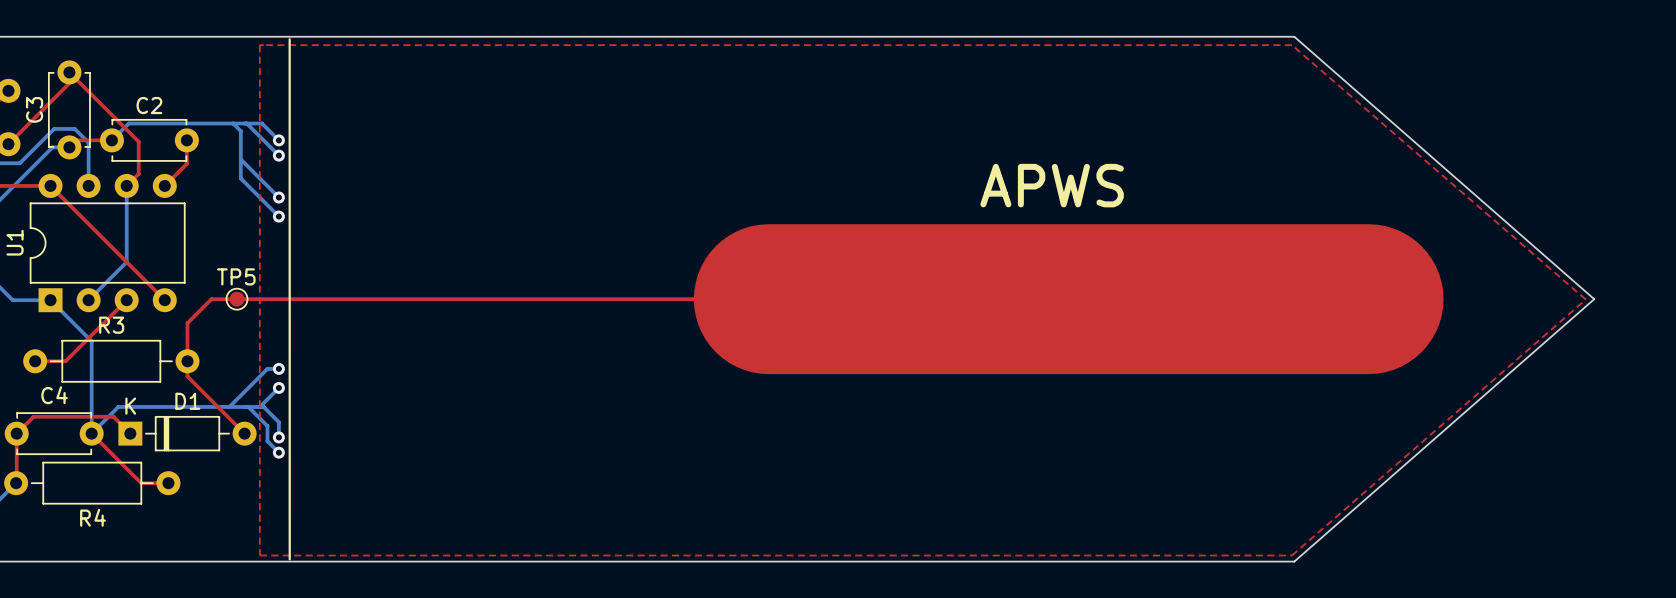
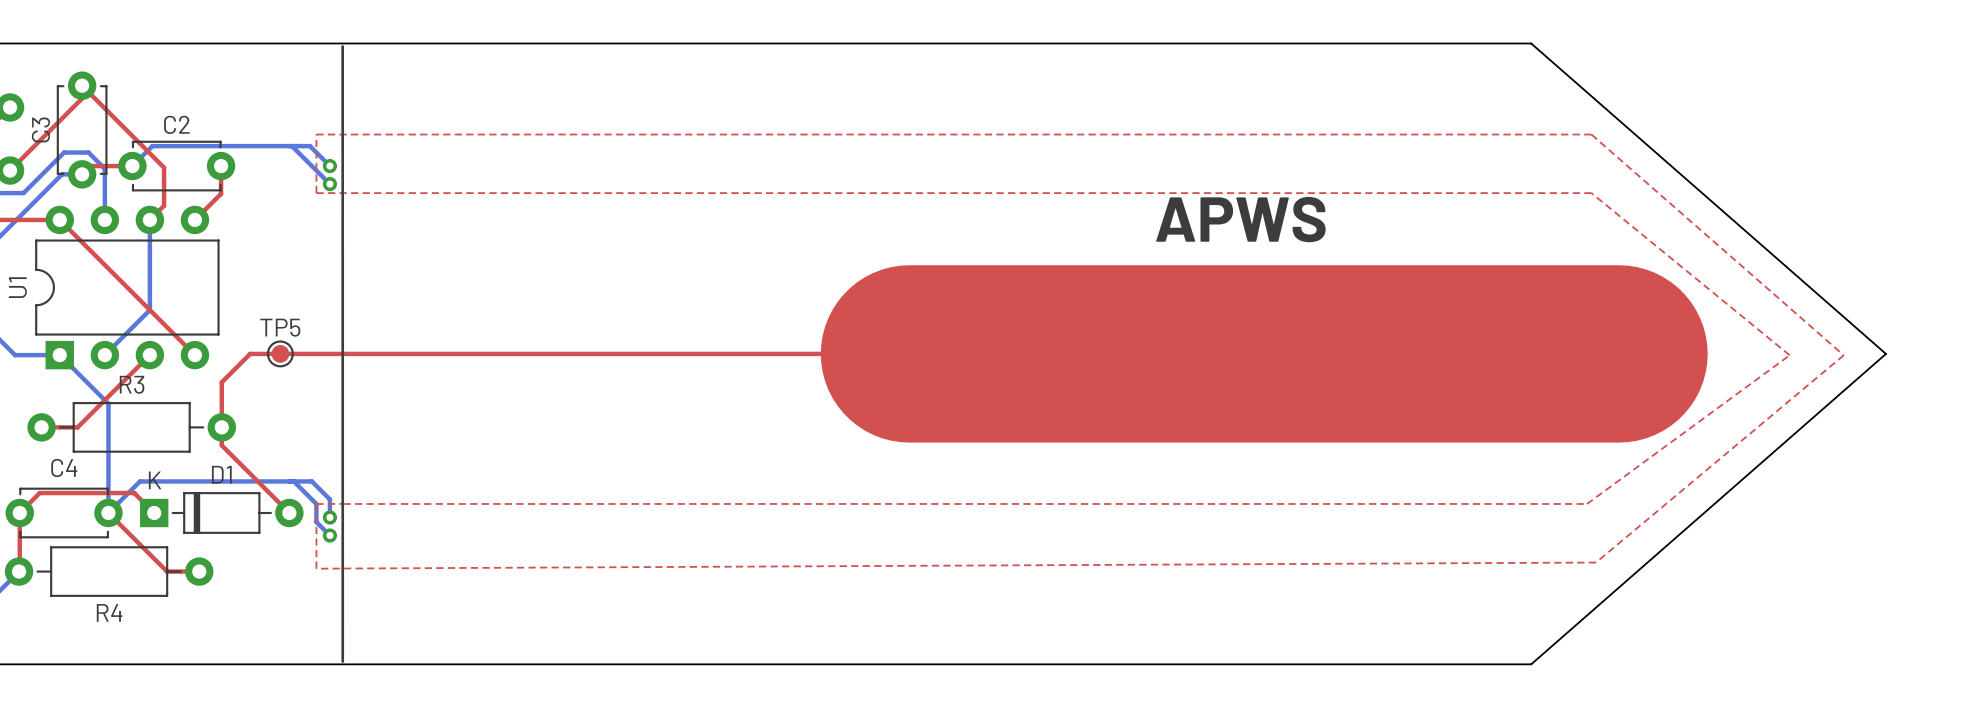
top zone outline: (259, 45) (259, 555) (1291, 555) (1585, 299) (1291, 45) (259, 45) -> (316, 134) (316, 193) (1591, 193) (1789, 355) (1586, 503) (316, 503) (316, 568) (1595, 562) (1843, 355) (1591, 134) (316, 134)
bottom track: (233, 123) (240, 131) (240, 178) (278, 216) -> none
bottom track: (240, 159) (278, 197) -> none
via: (278, 197) -> none
via: (278, 216) -> none
bottom track: (278, 368) (267, 368) (229, 406) -> none
via: (278, 368) -> none
bottom track: (278, 387) (259, 406) -> none
via: (278, 387) -> none

